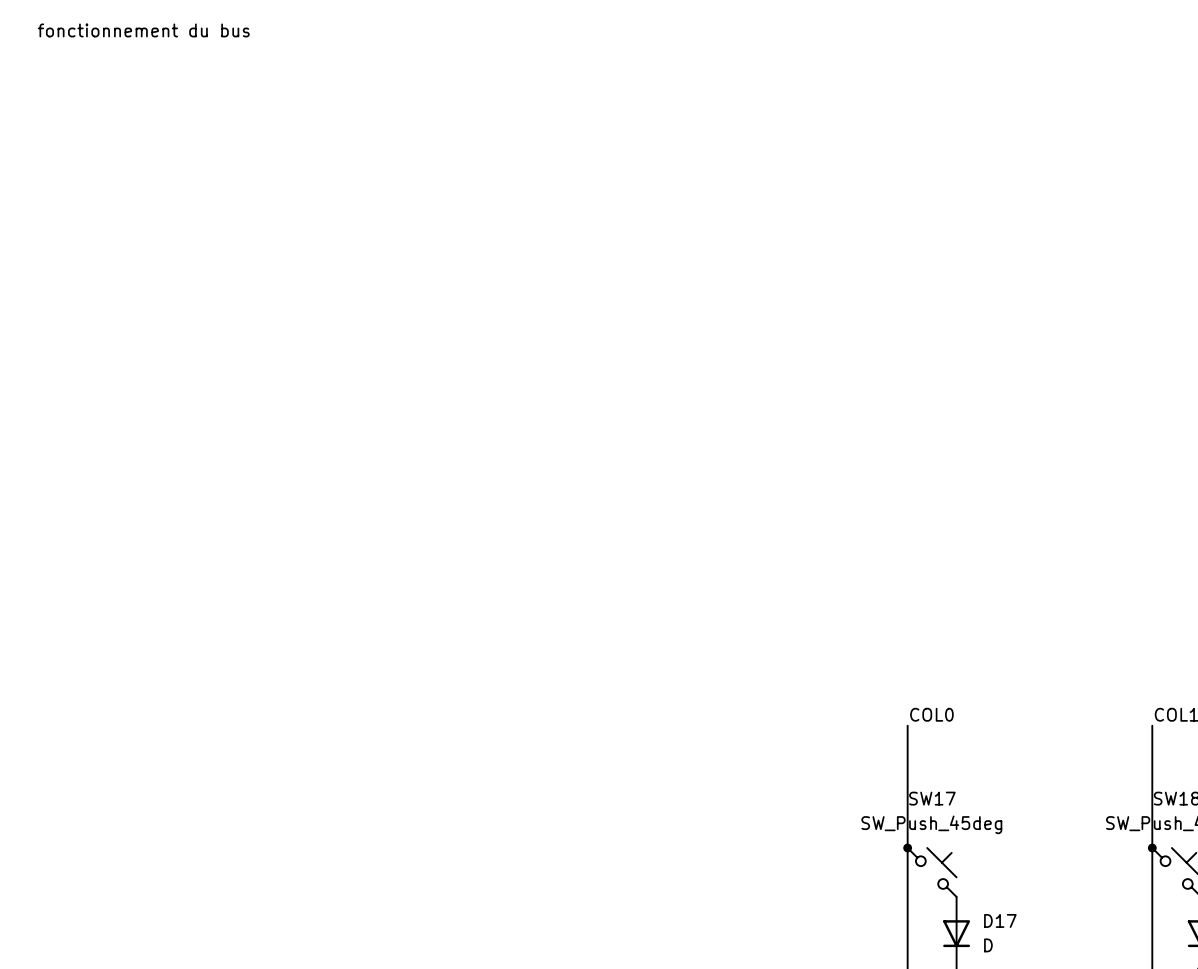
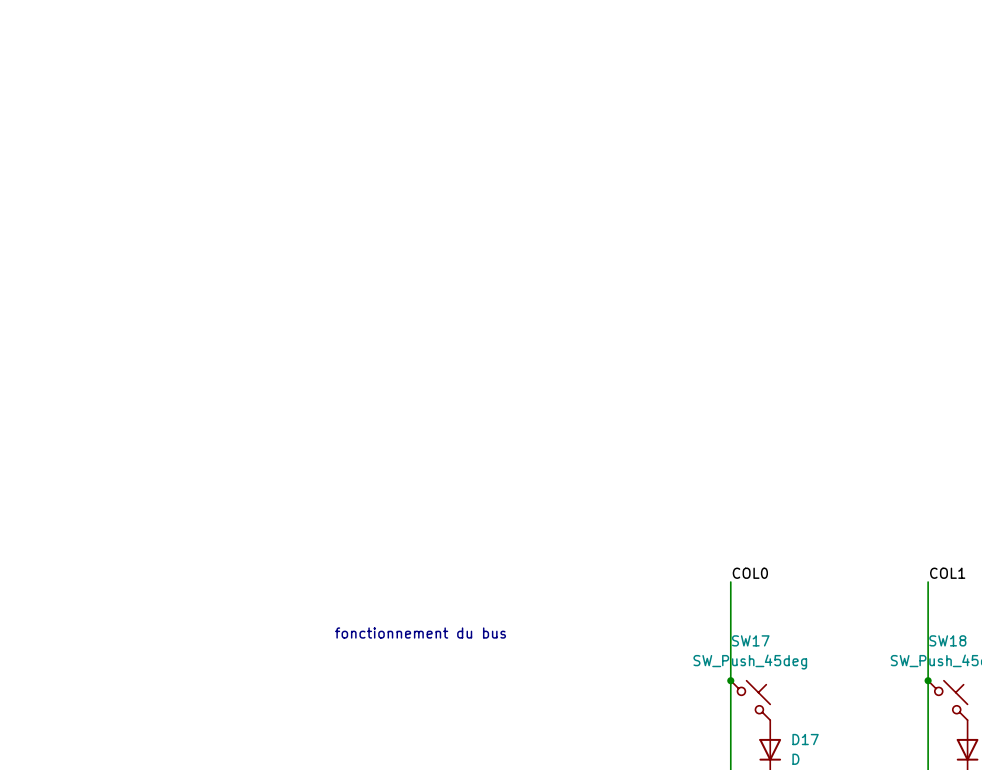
text: fonctionnement du bus (143, 30) -> none
text: none -> fonctionnement du bus (420, 633)

